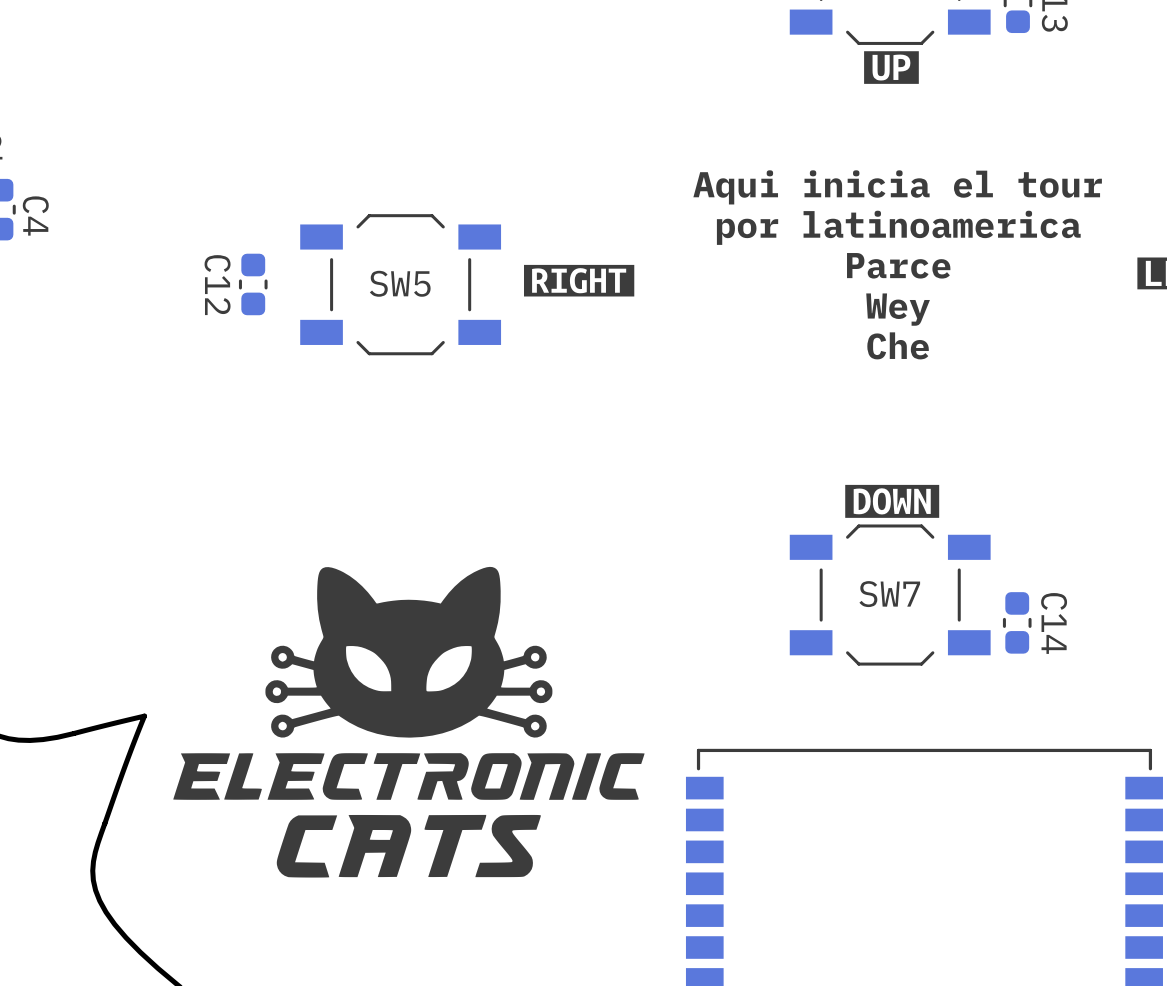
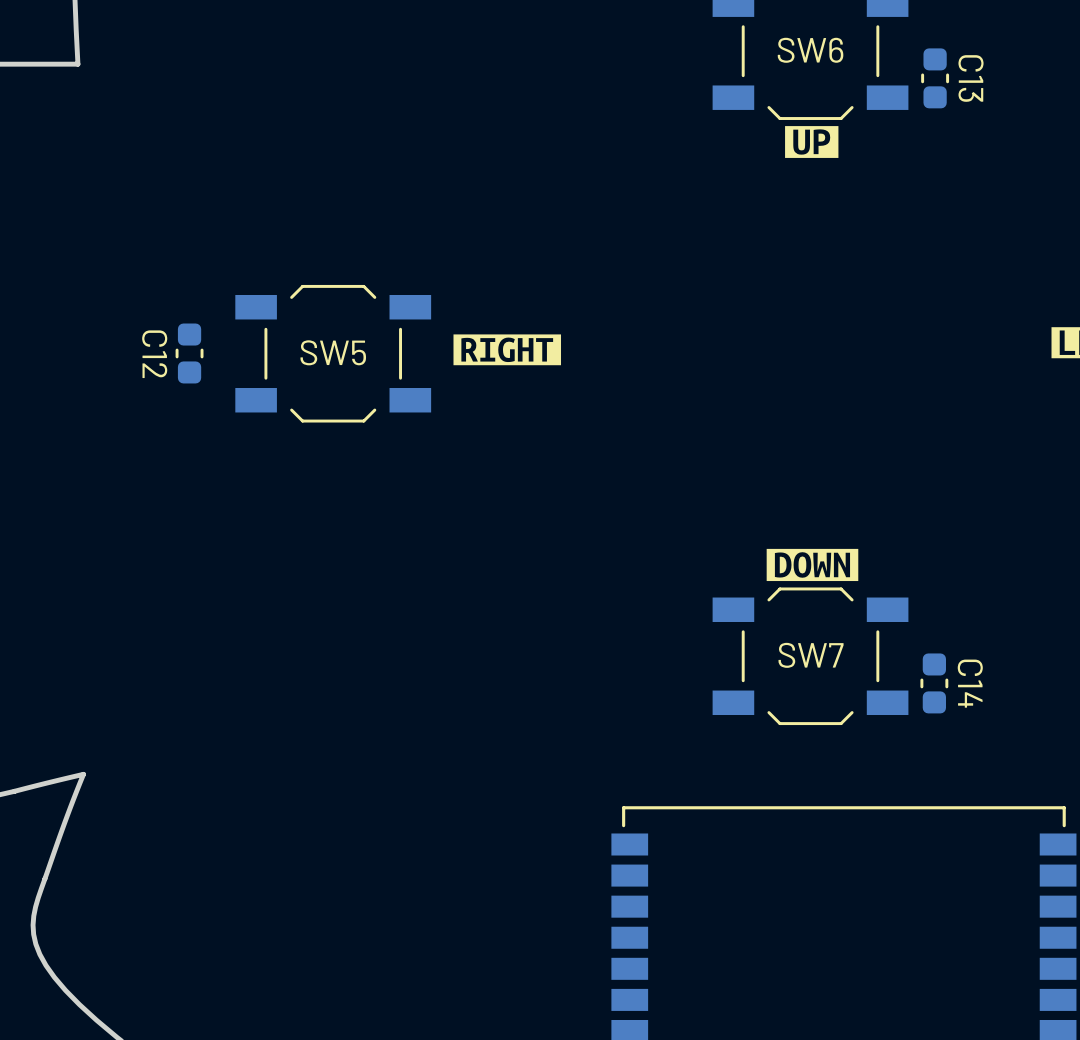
text: Aqui inicia el tour (897, 187) -> none
text: por latinoamerica (898, 227) -> none
text: Parce (898, 265) -> none
text: Wey (898, 309) -> none
text: Che (898, 345) -> none
drawing: [173, 566, 645, 878] -> none

